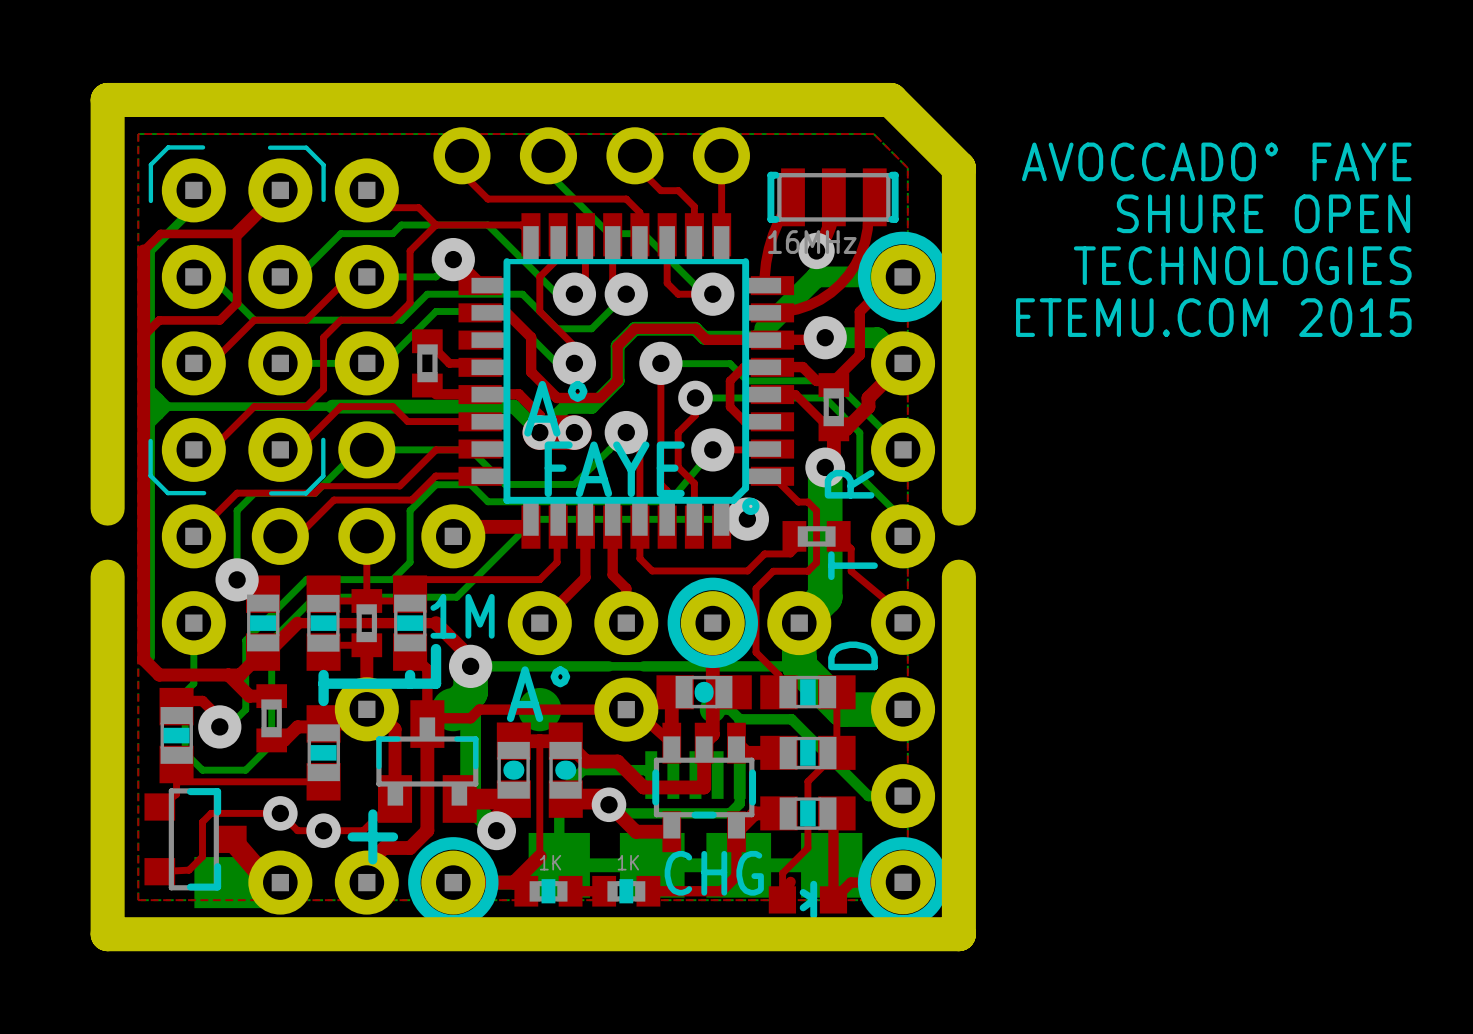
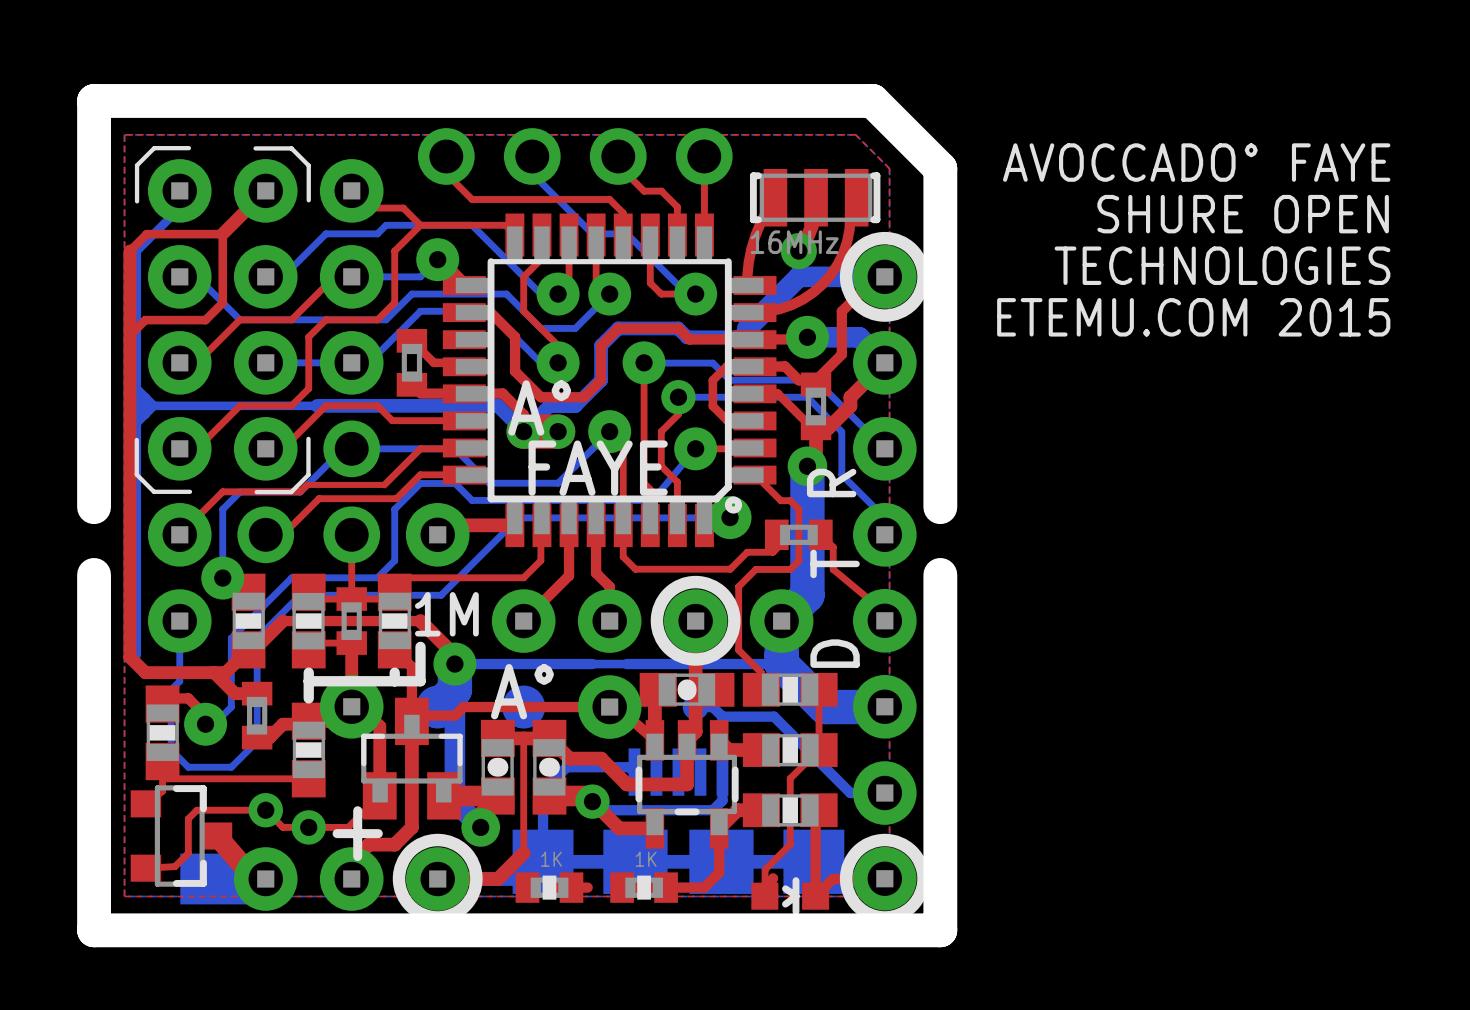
text: CHG (714, 873) -> none
part position: (548, 891) -> (549, 887)
part position: (626, 891) -> (644, 887)

